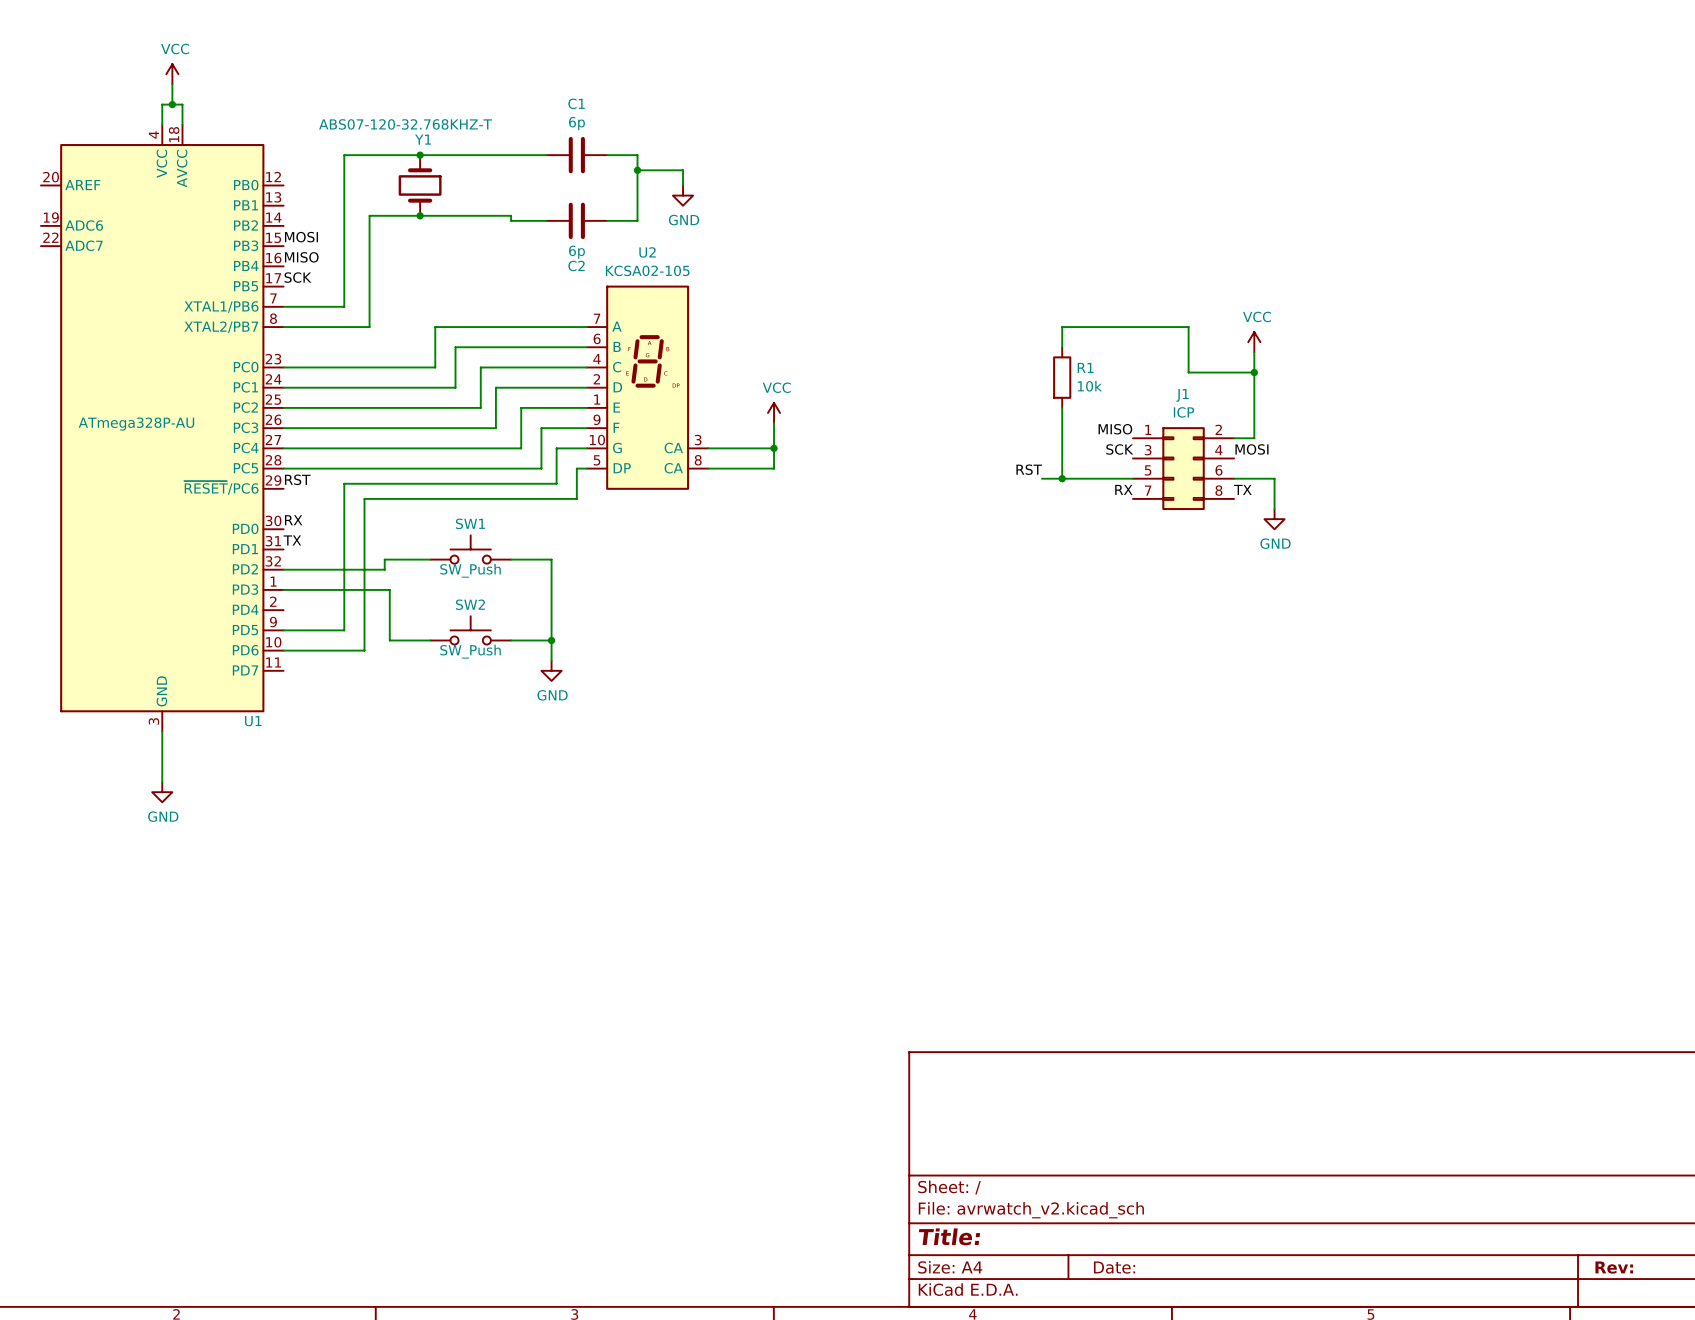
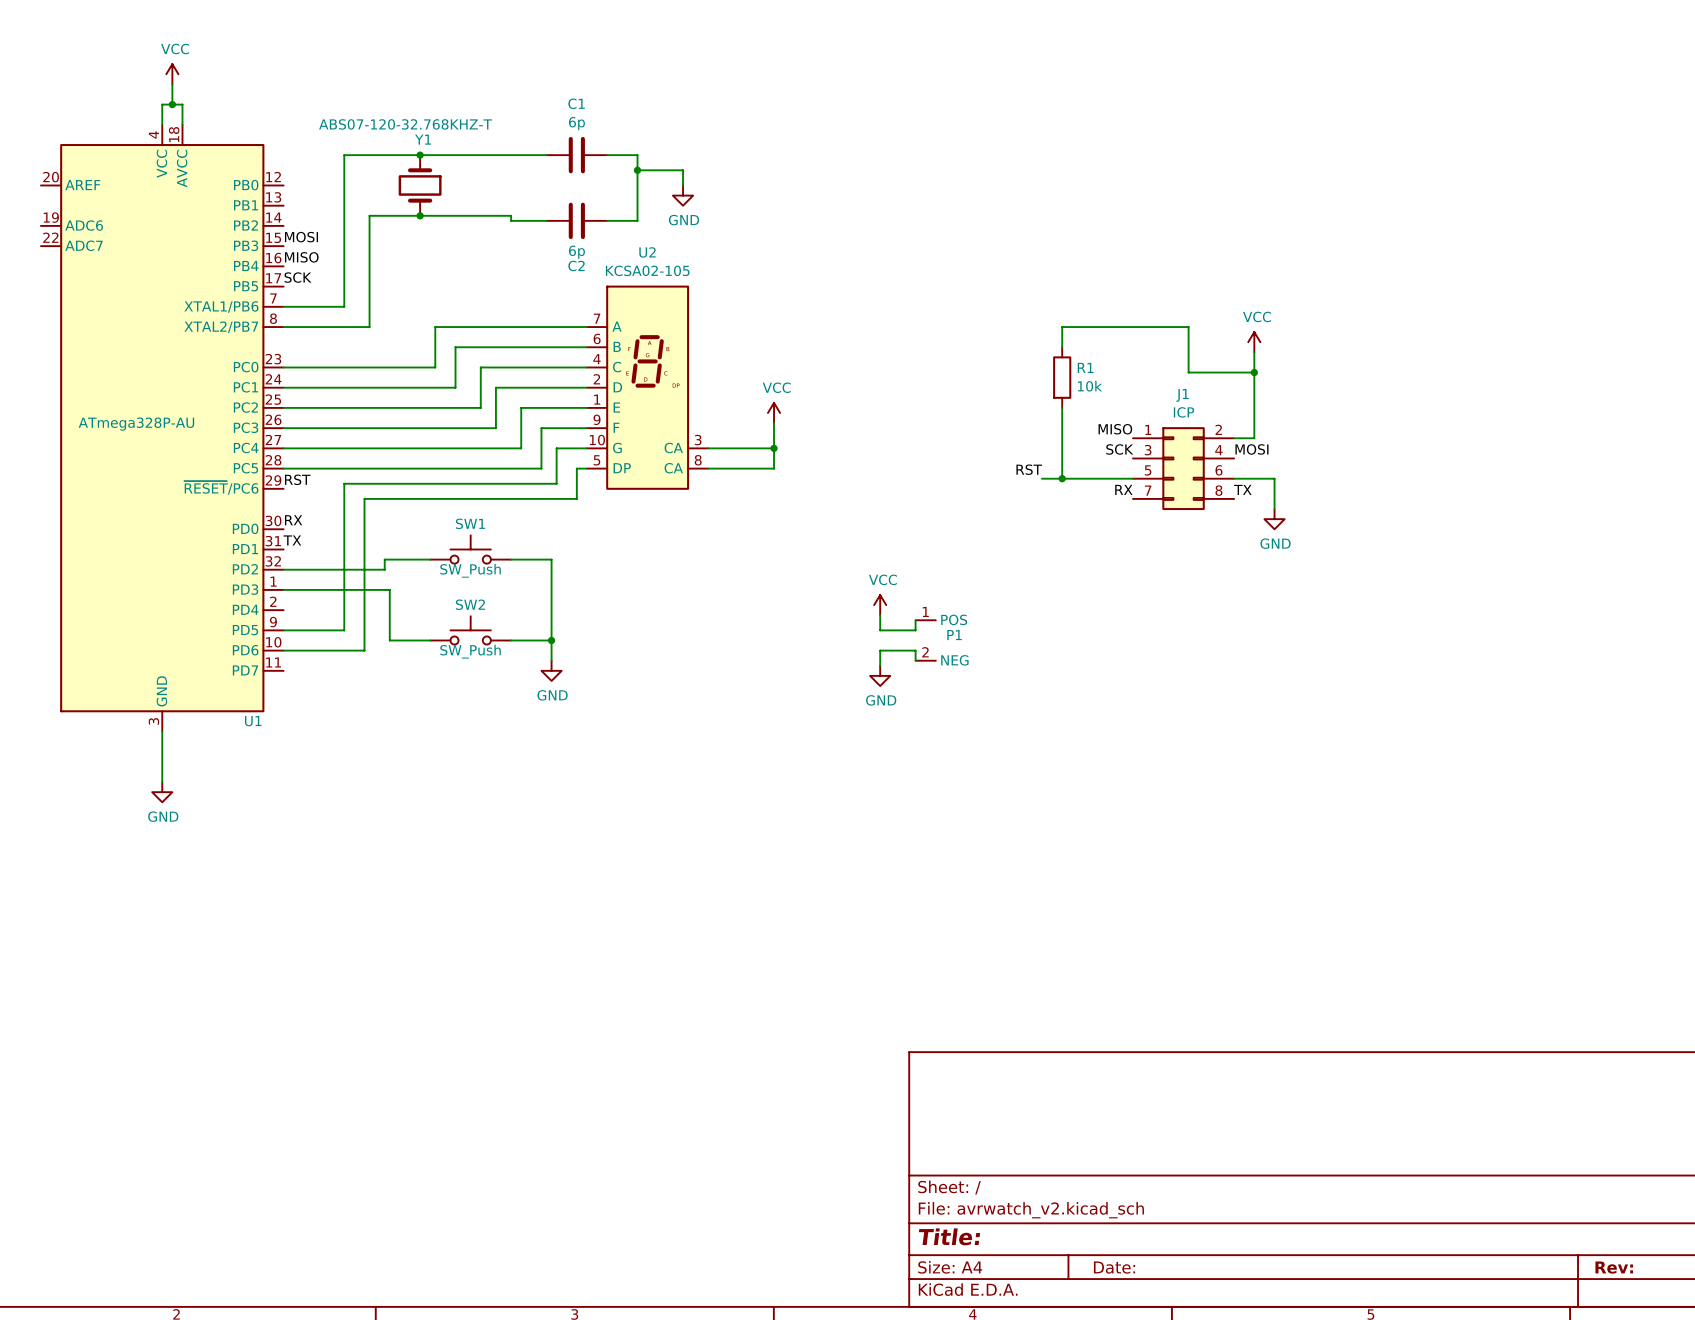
power symbol: none -> VCC (880, 605)
wire: none -> (880, 615) (880, 630) (915, 630) (915, 620)
P1: none -> (925, 640)
wire: none -> (915, 660) (915, 650) (880, 650) (880, 665)
power symbol: none -> GND (880, 675)

